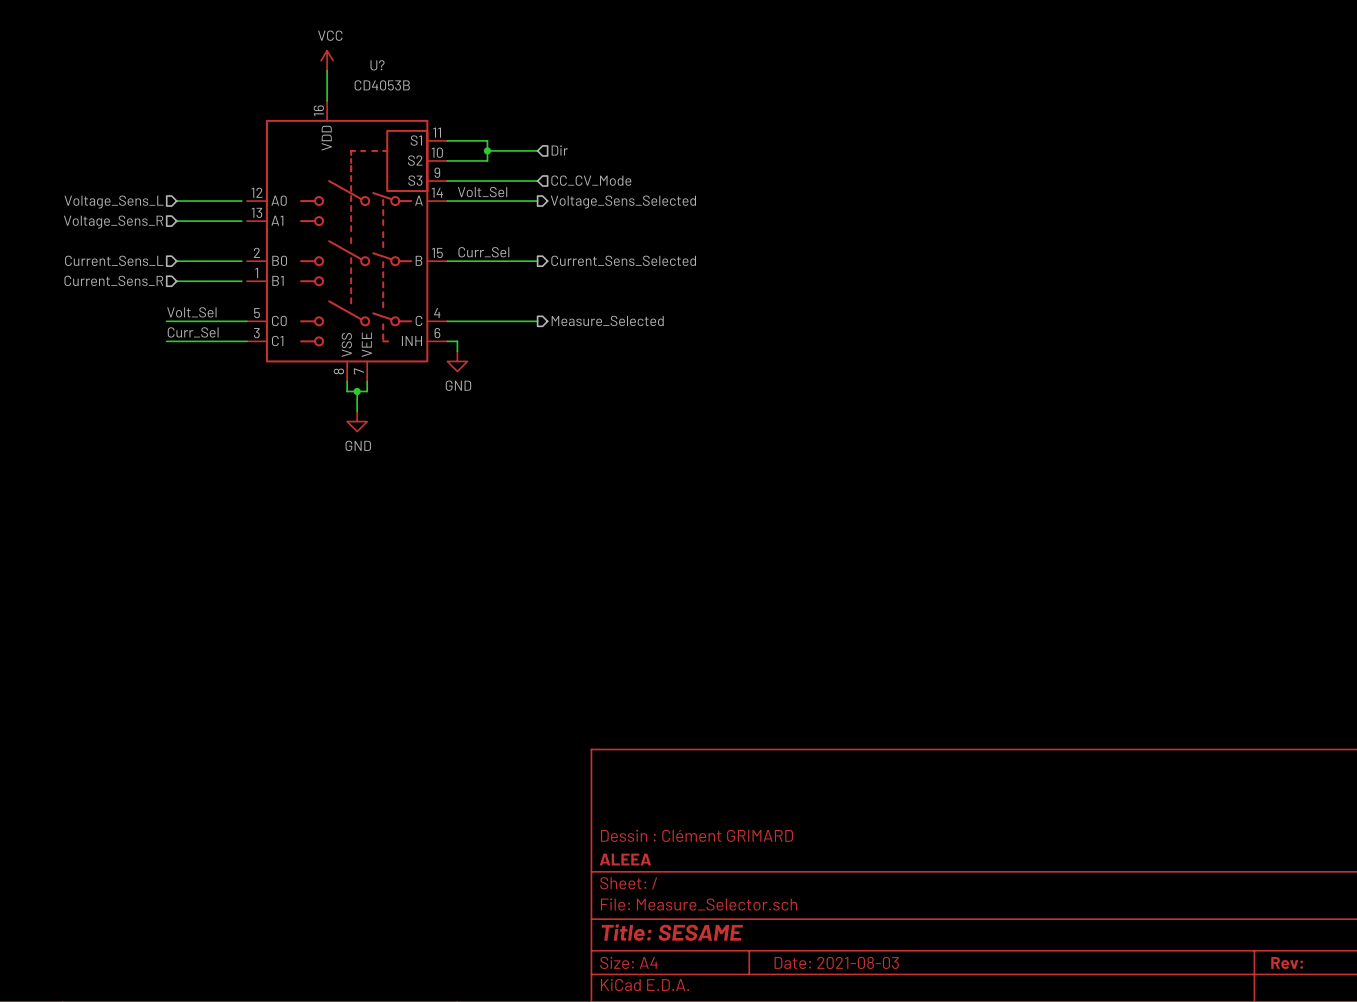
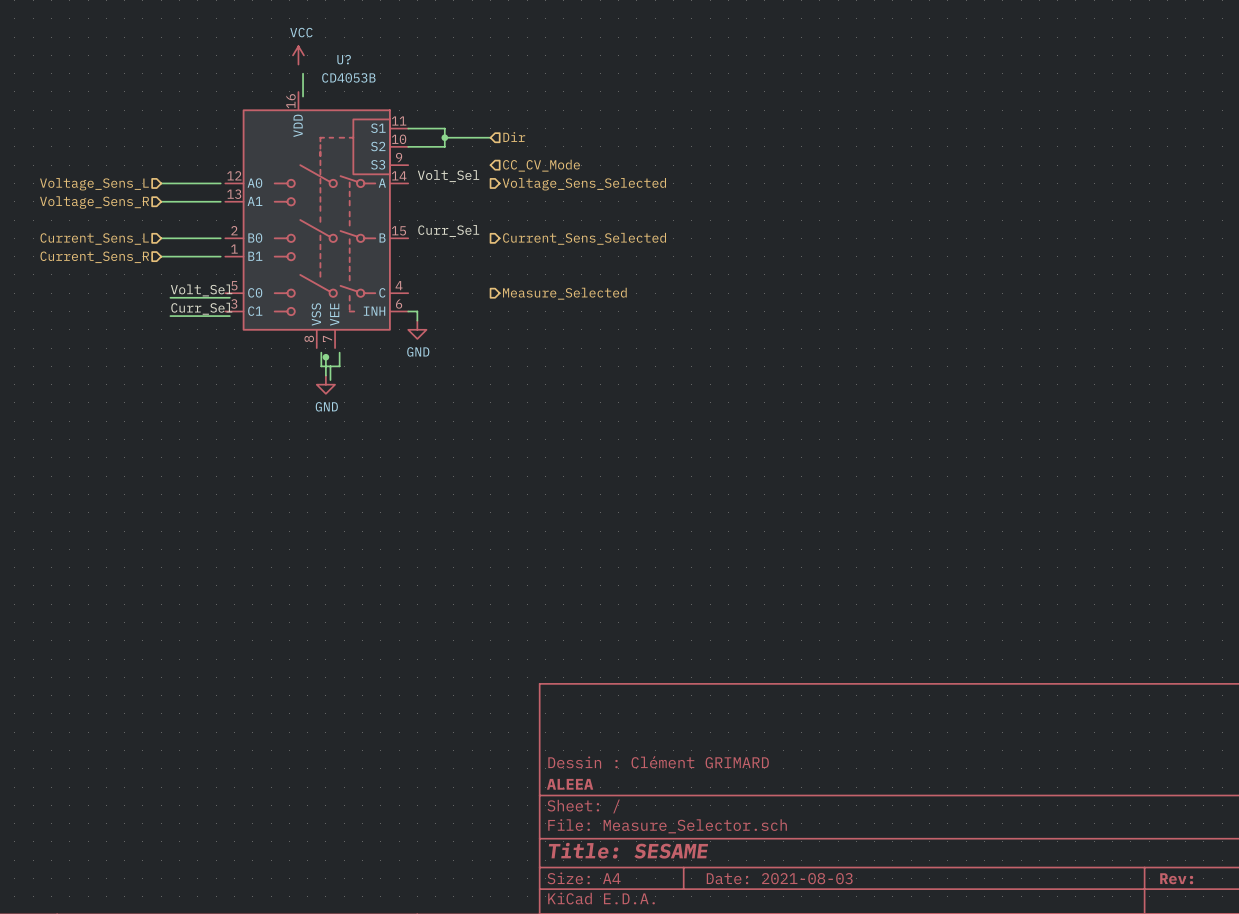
wire: (327, 70) (327, 100) -> none
wire: none -> (303, 73) (303, 96)
wire: (447, 181) (537, 181) -> none
wire: (447, 201) (537, 201) -> none
wire: (447, 261) (537, 261) -> none
label position: Volt_Sel (191, 312) -> Volt_Sel (201, 290)
wire: (166, 321) (246, 321) -> none
wire: (447, 321) (537, 321) -> none
wire: none -> (170, 297) (229, 297)
label position: Curr_Sel (193, 332) -> Curr_Sel (201, 308)
wire: (166, 341) (246, 341) -> none
wire: none -> (170, 316) (229, 316)
wire: (347, 381) (347, 391) (367, 391) (367, 381) -> none
wire: none -> (321, 352) (321, 366) (339, 366) (339, 352)
wire: none -> (330, 366) (330, 380)

